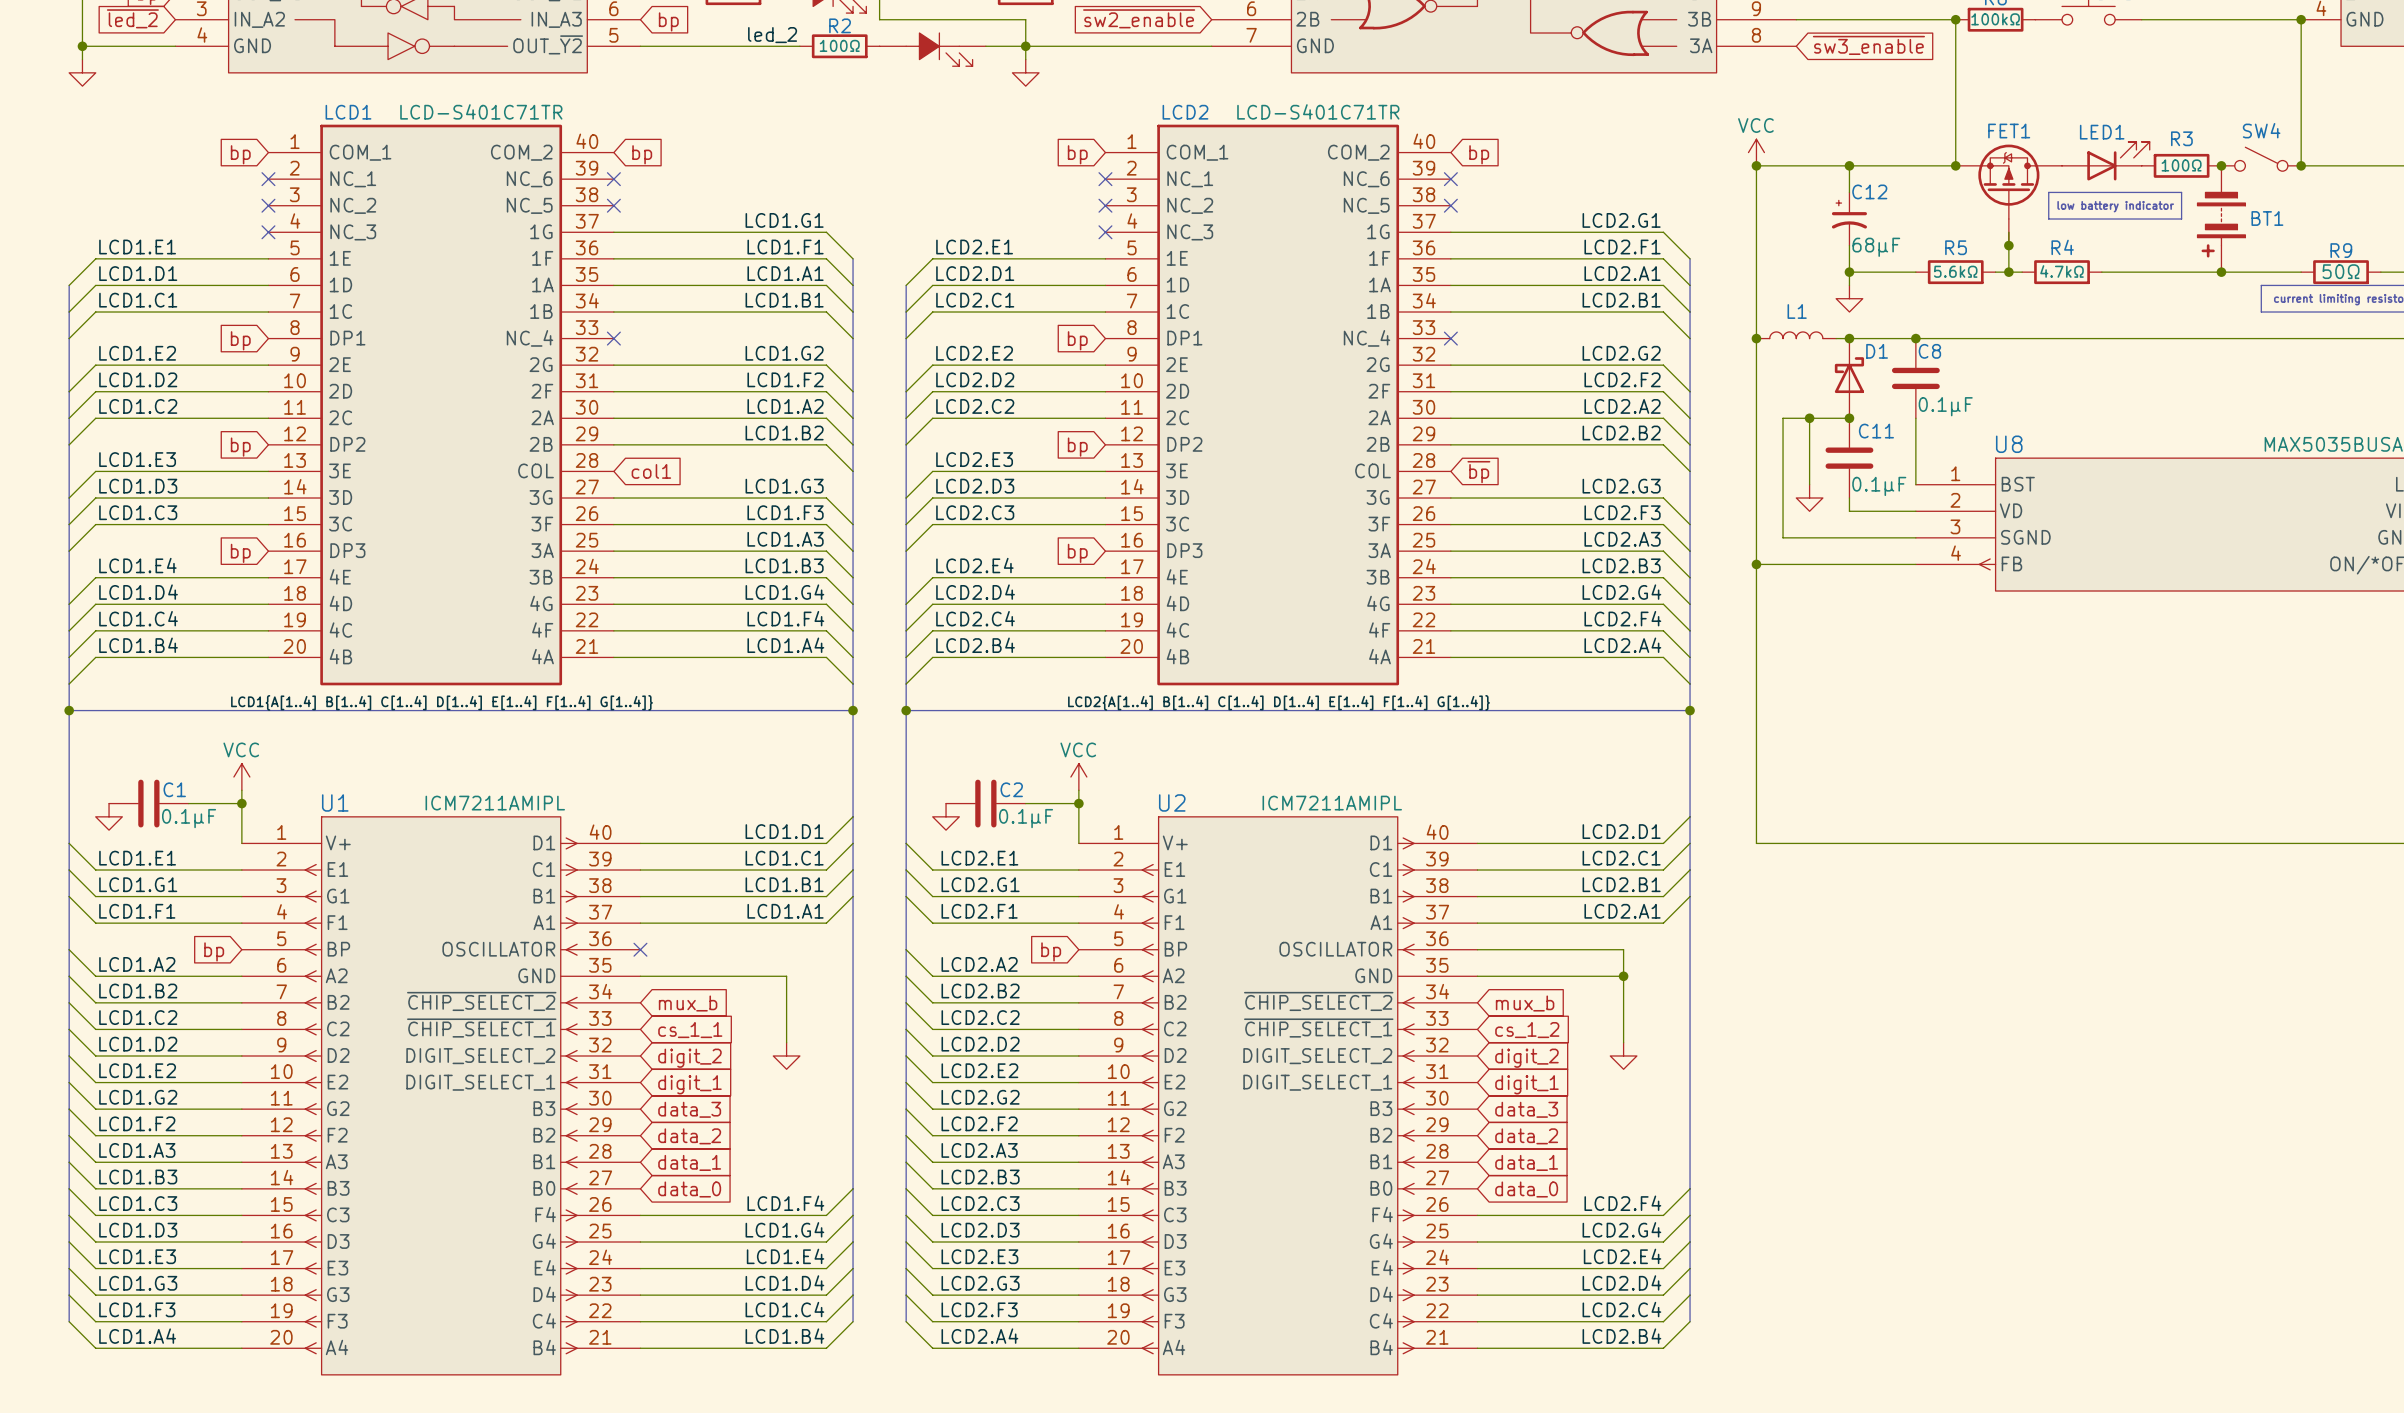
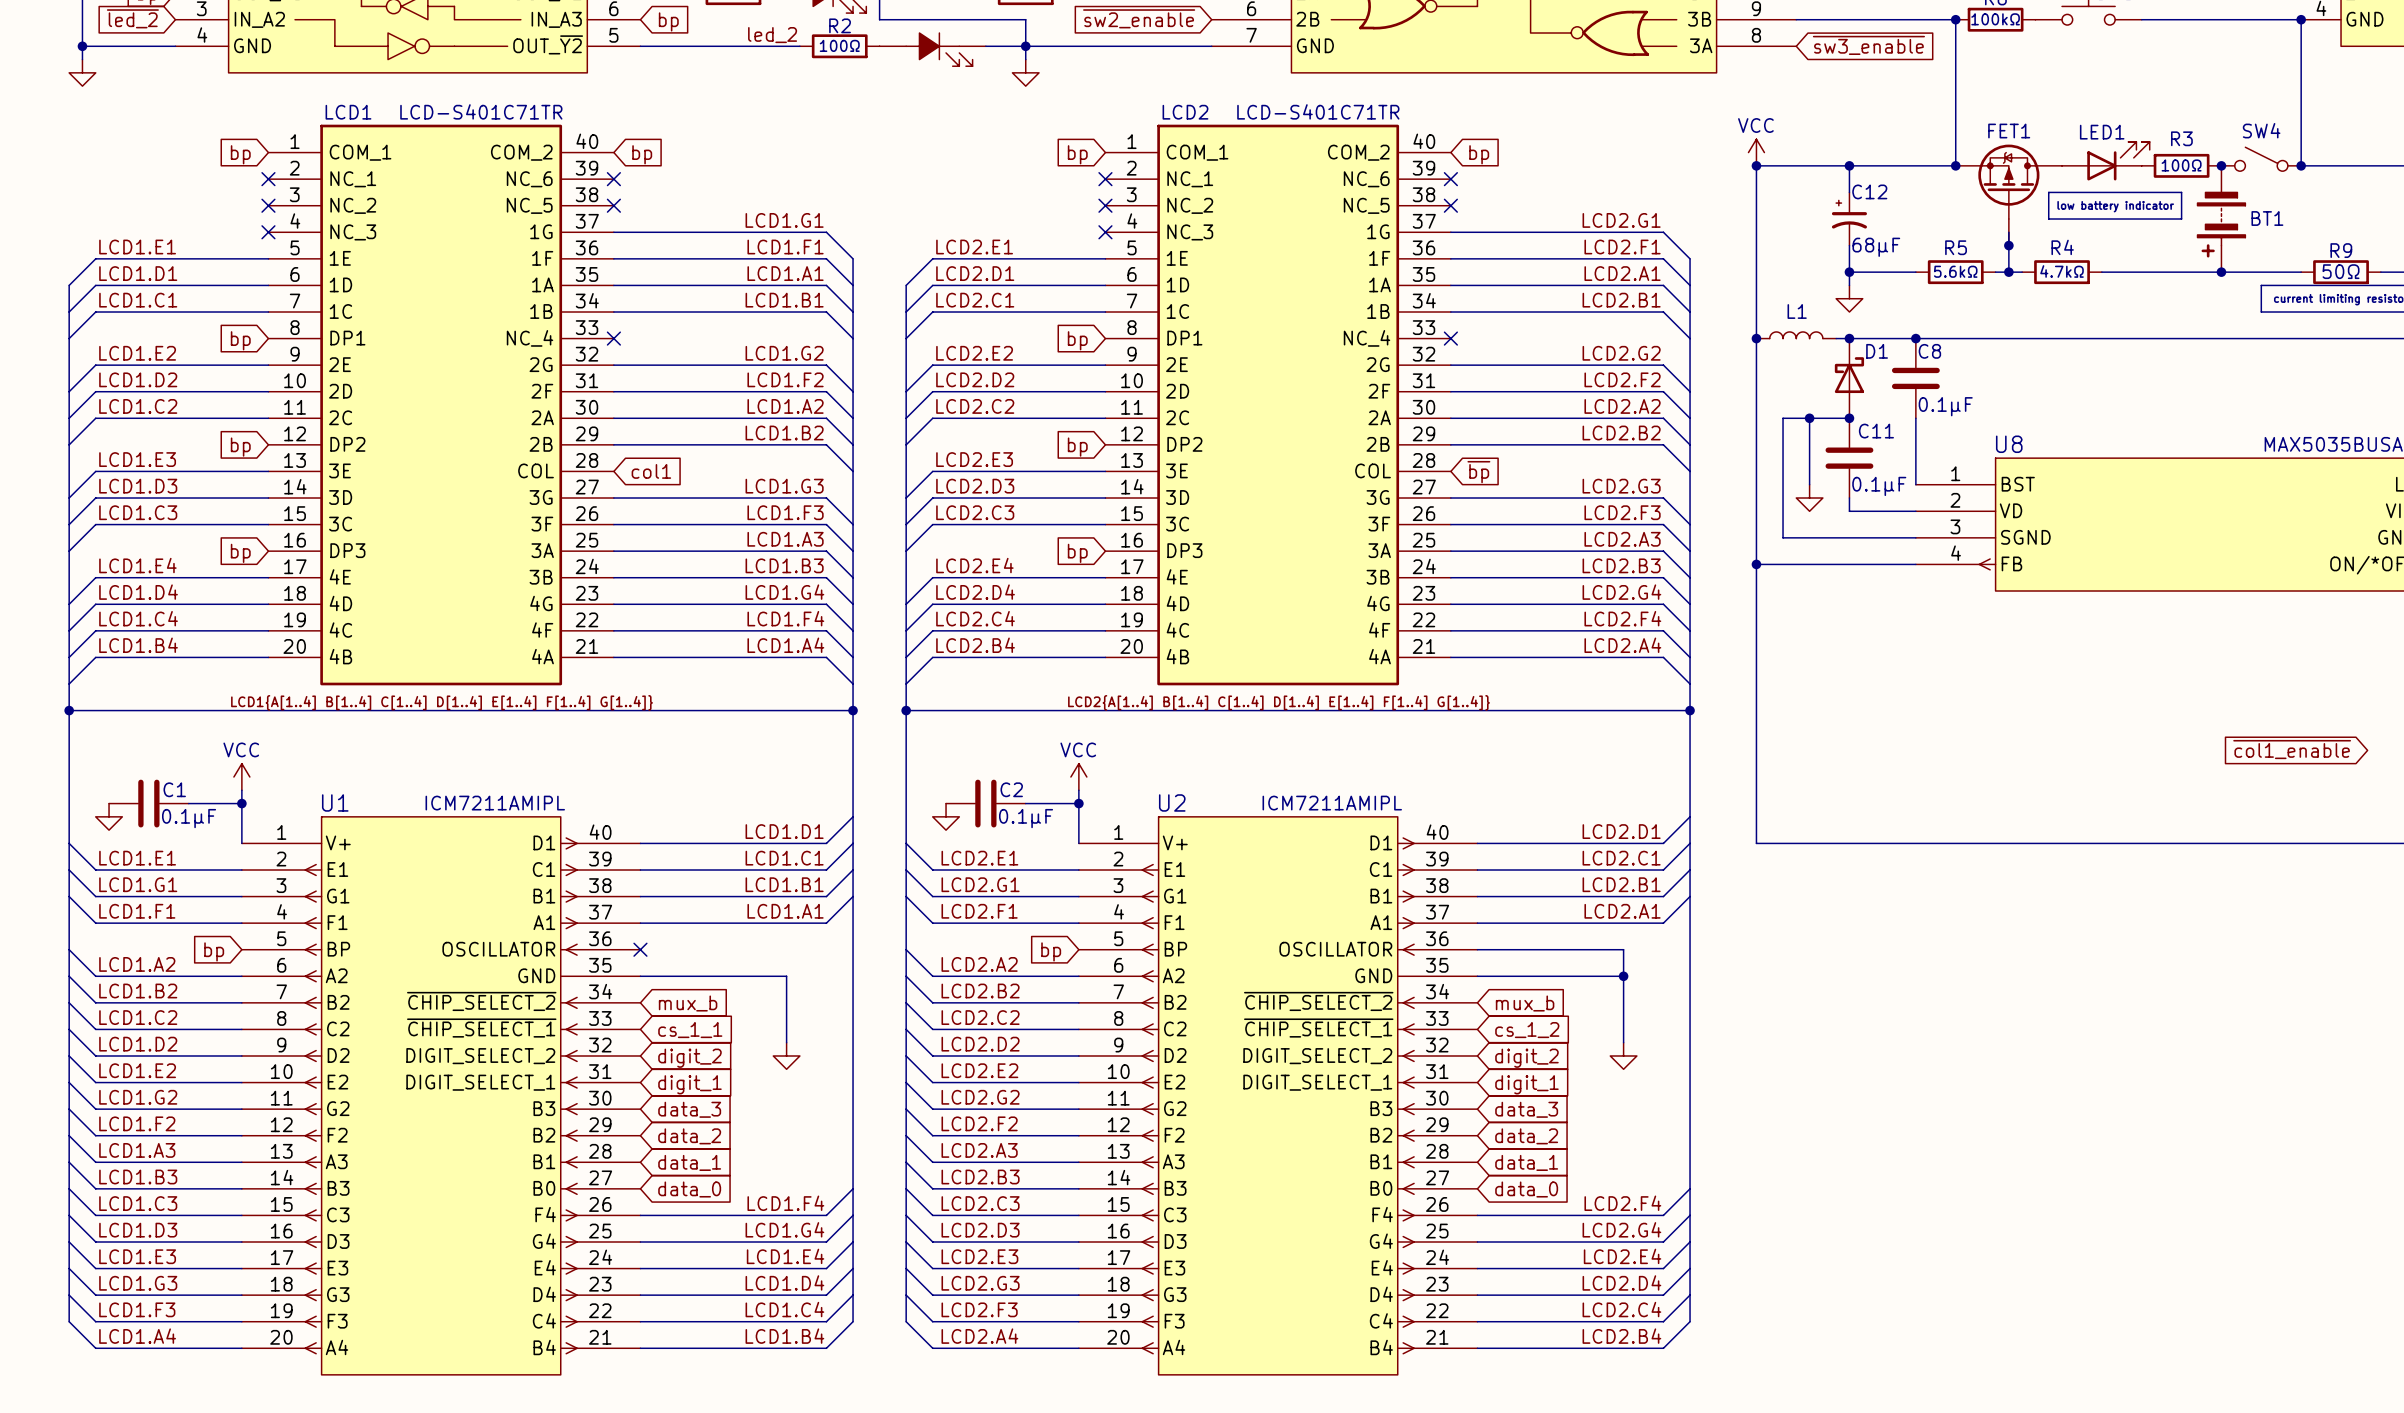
global label: none -> ~{col1_enable} (2292, 749)

